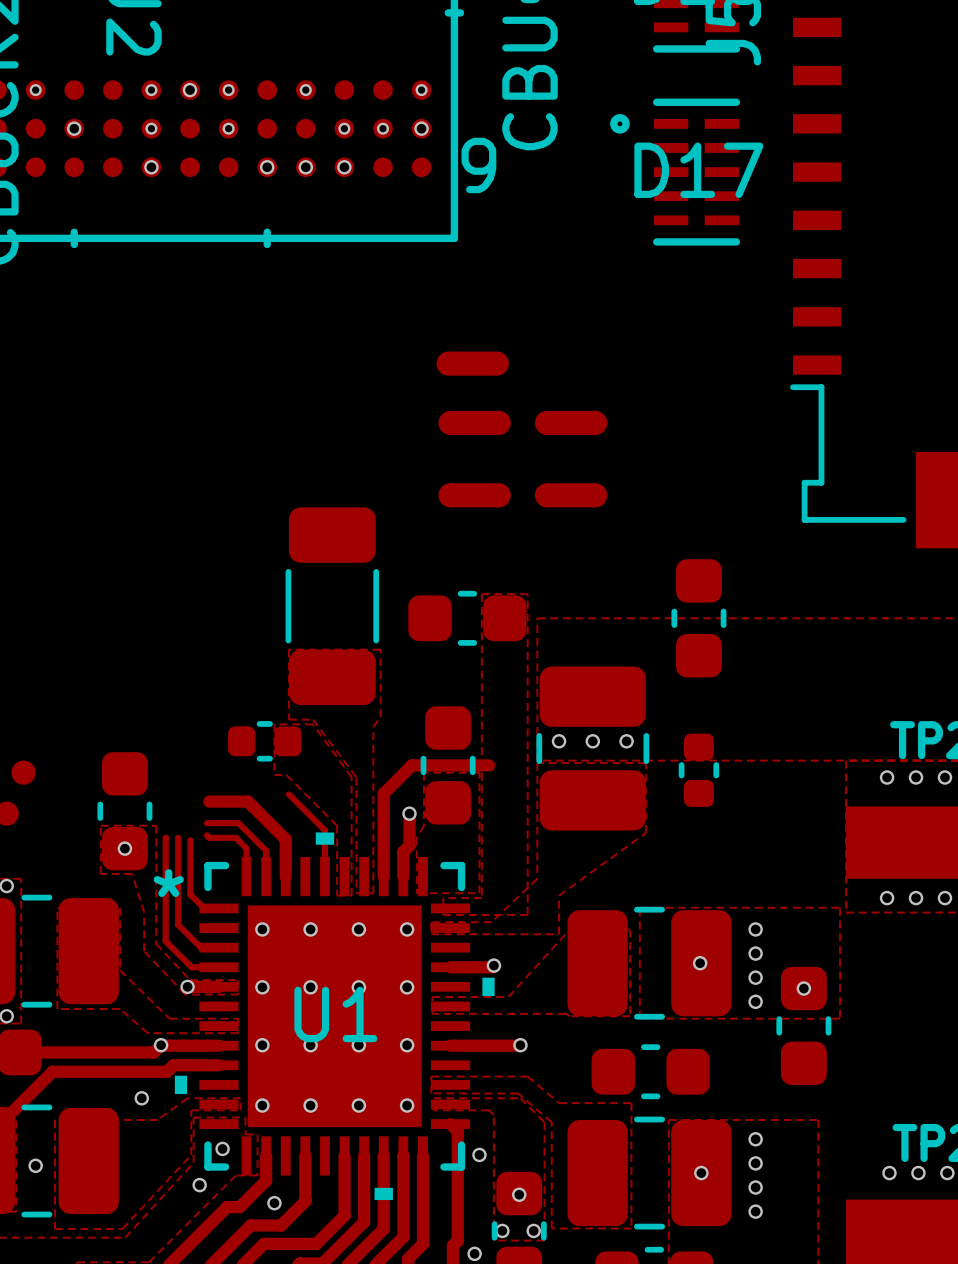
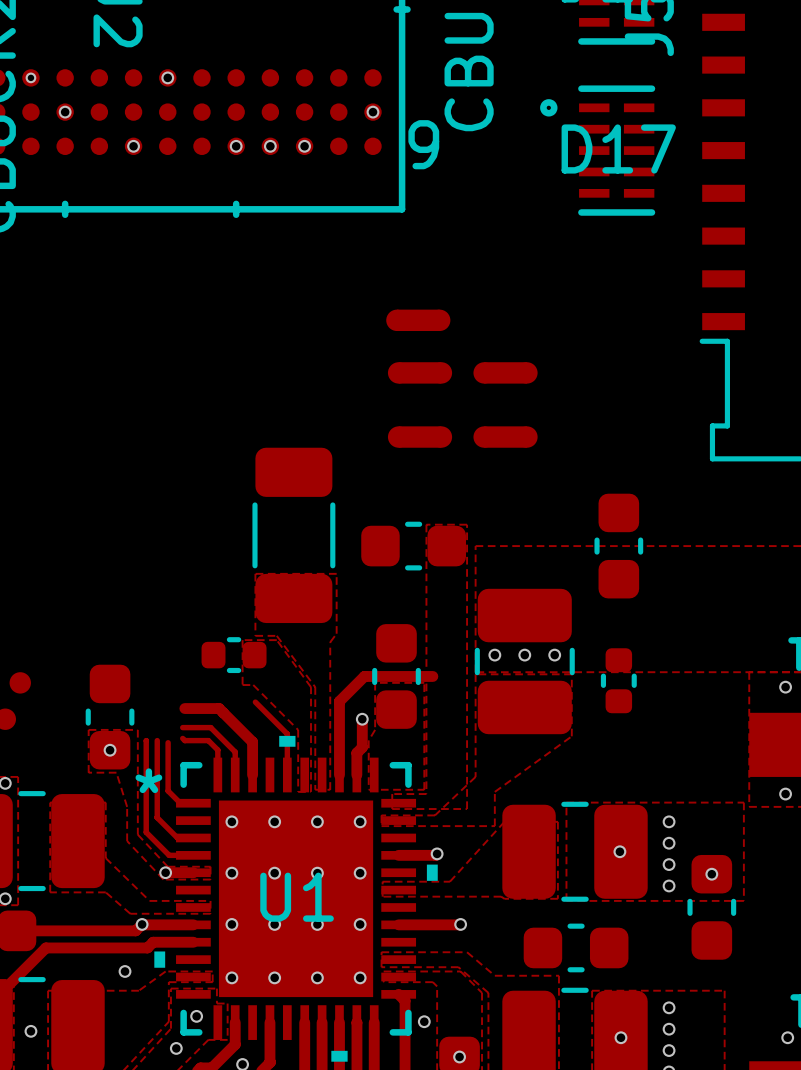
via: (151, 90) -> none
via: (228, 90) -> none
via: (305, 90) -> none
via: (421, 90) -> none
via: (151, 128) -> none
via: (228, 128) -> none
via: (344, 128) -> none
via: (382, 128) -> none

